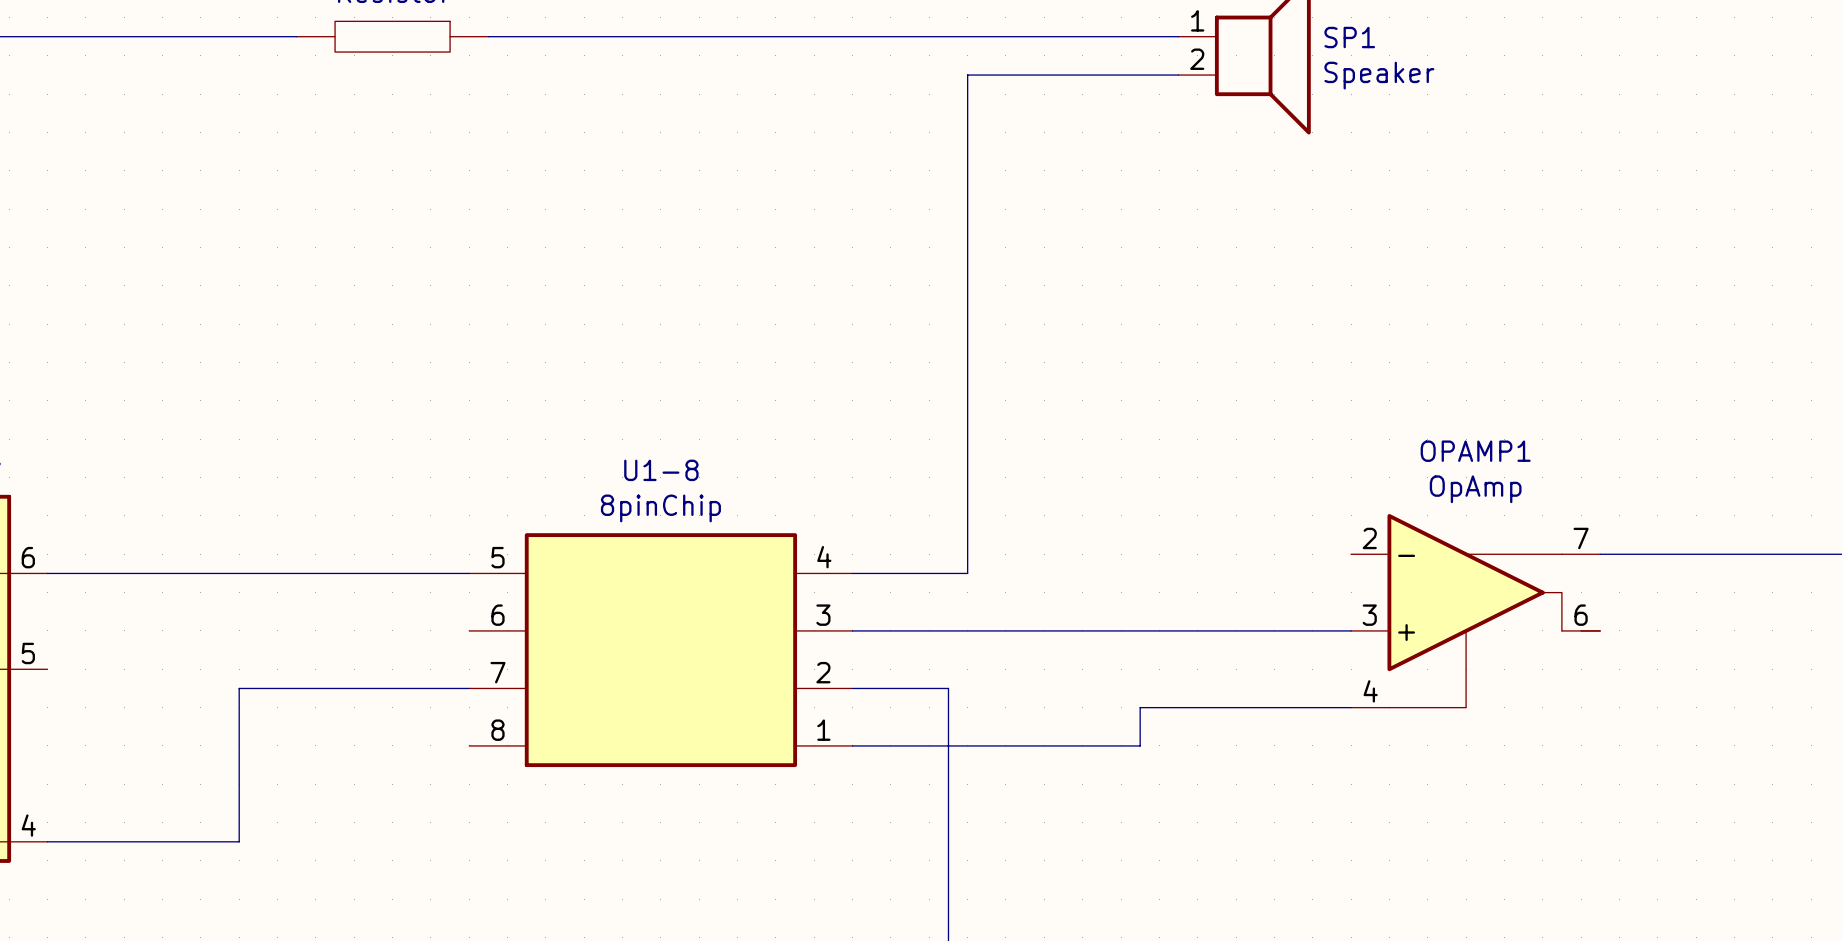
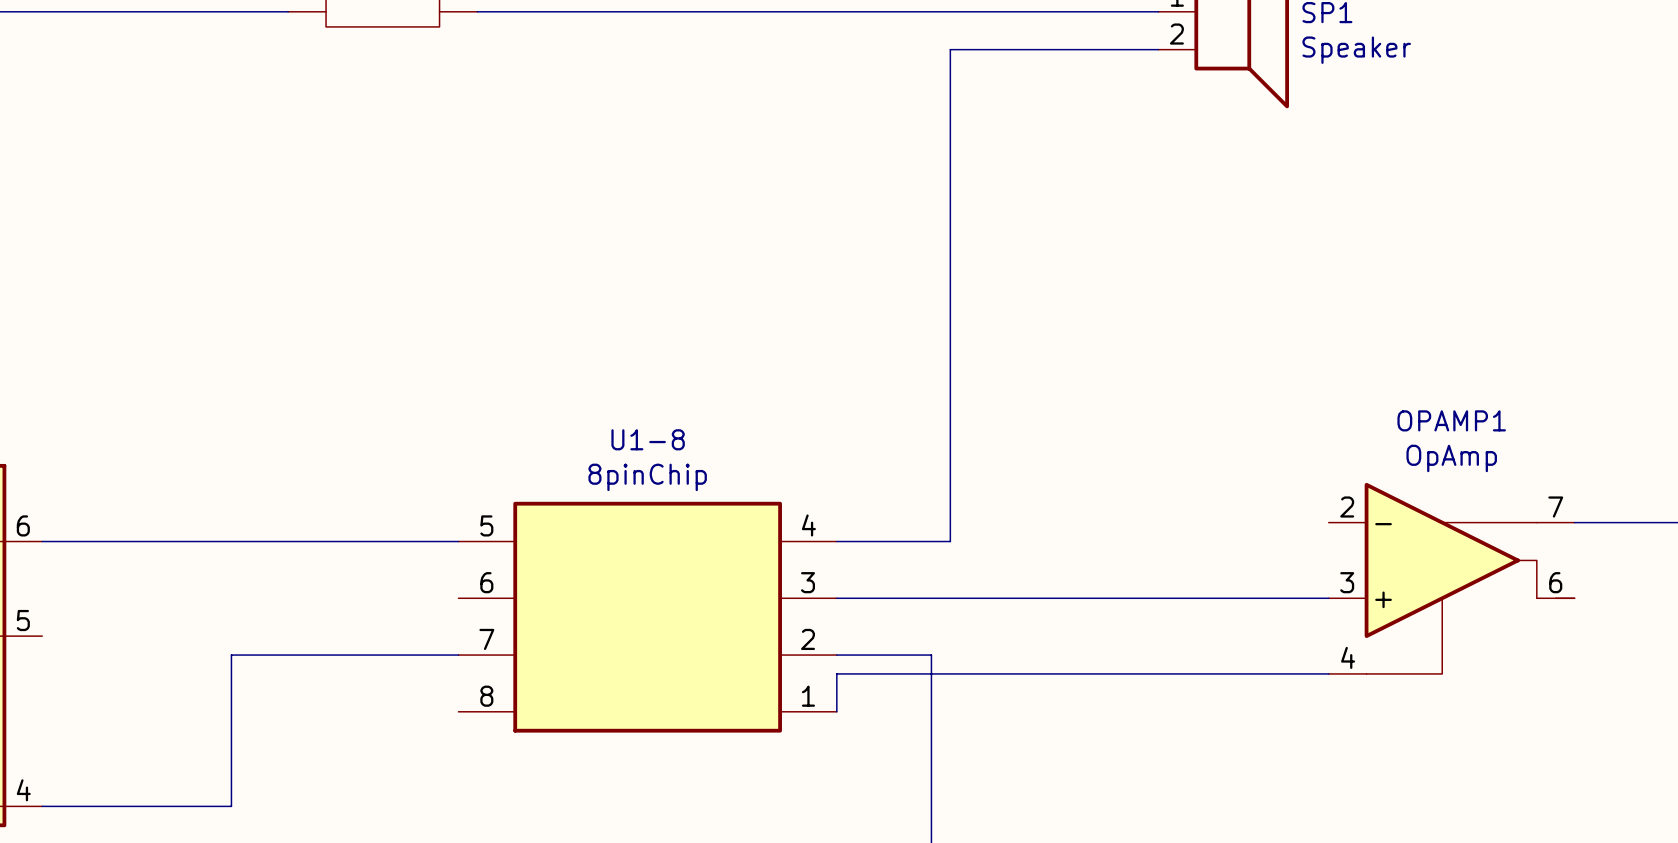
wire: (1140, 707) (1140, 745) (852, 745) -> (1120, 673) (836, 673) (836, 711)

